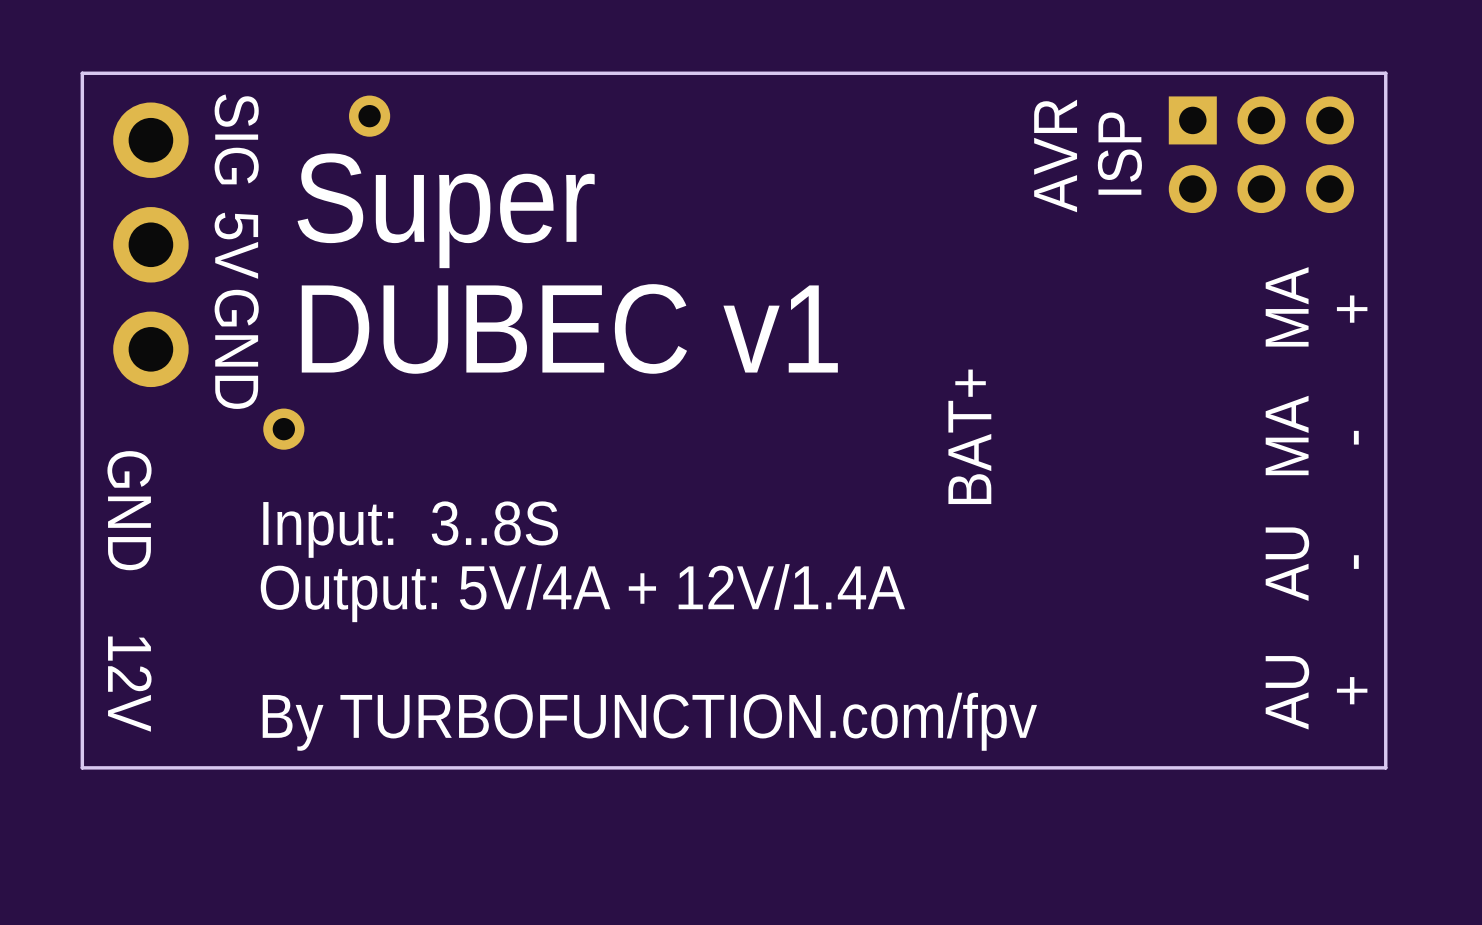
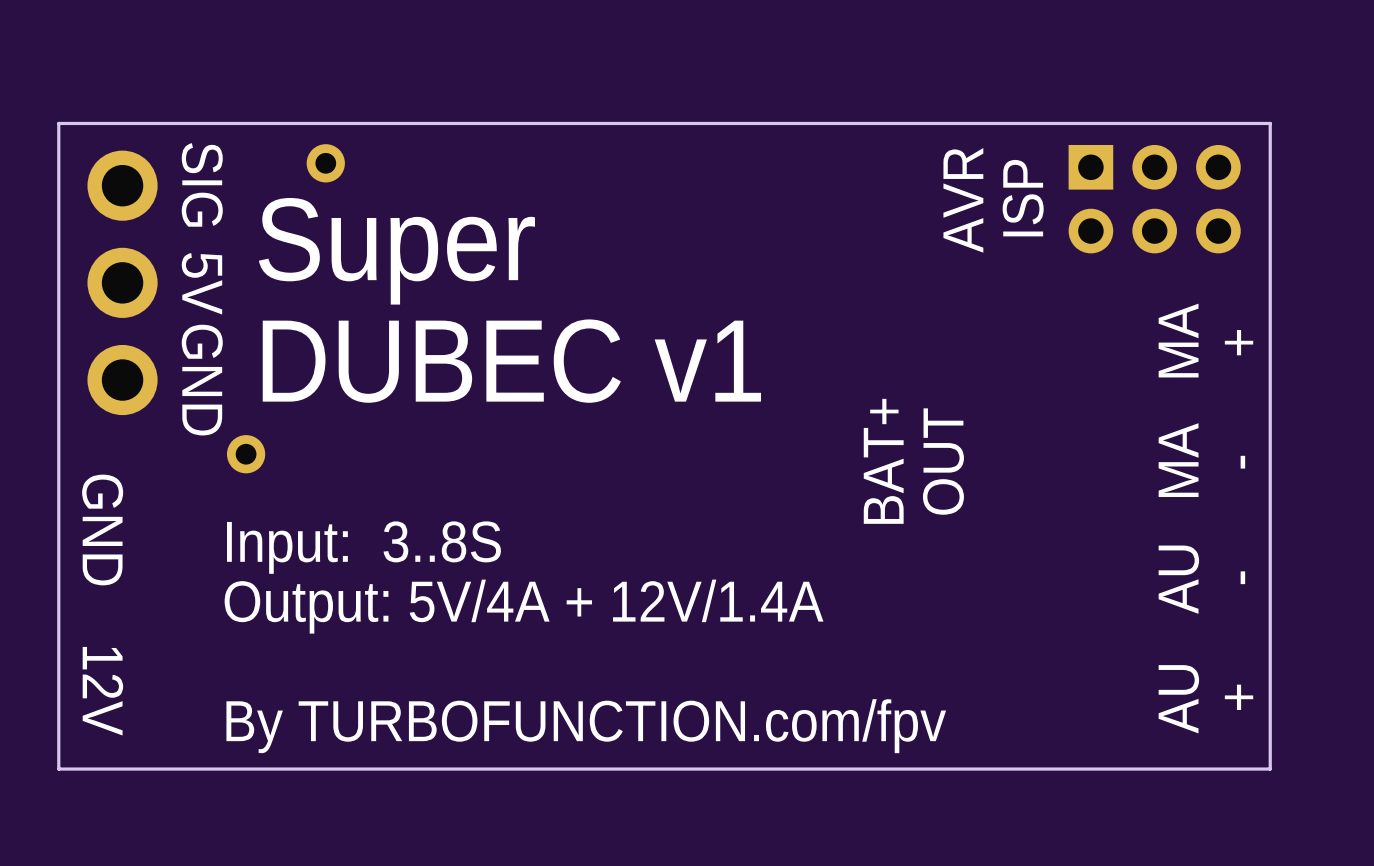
text: BAT+ (969, 436) -> OUT (943, 461)

